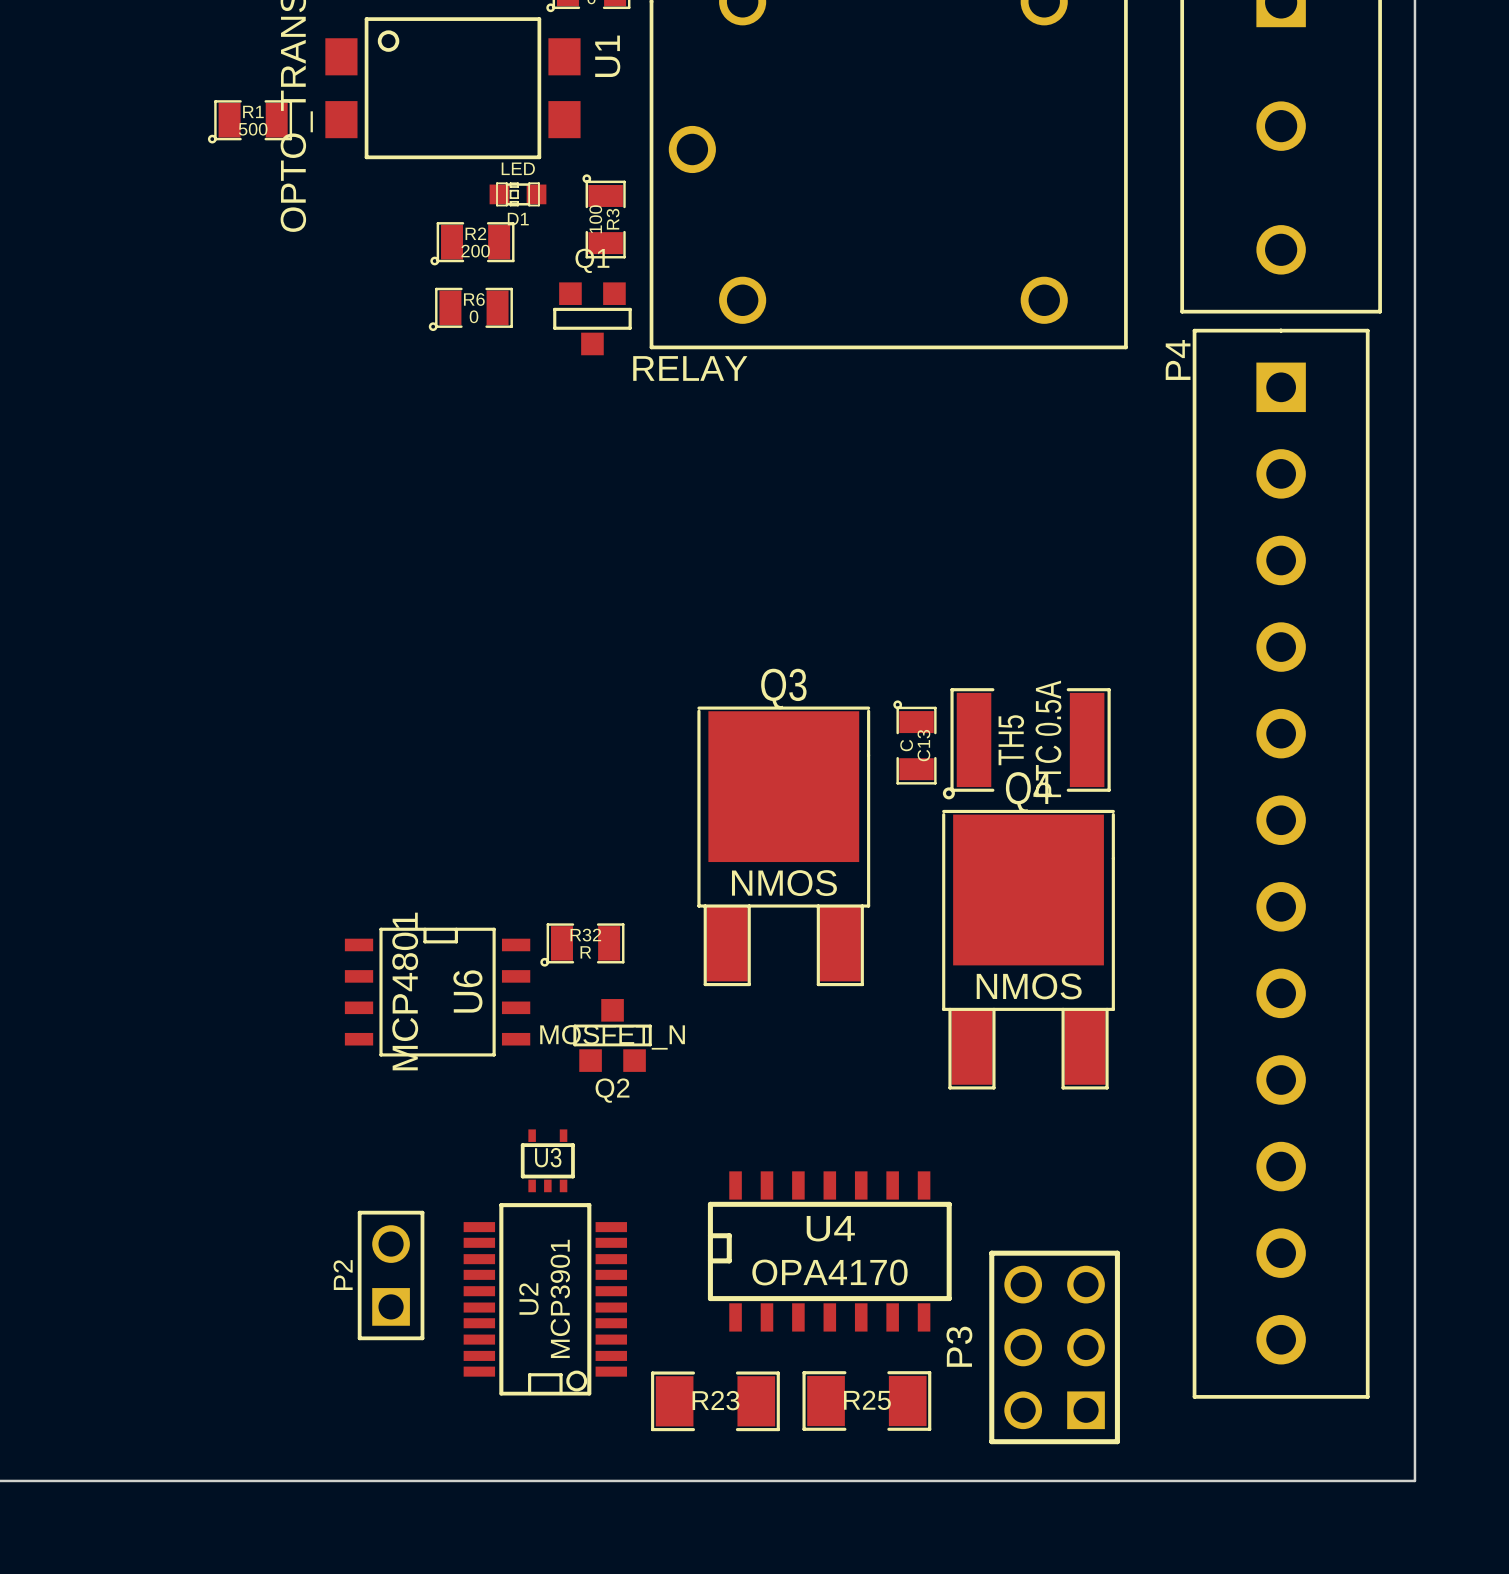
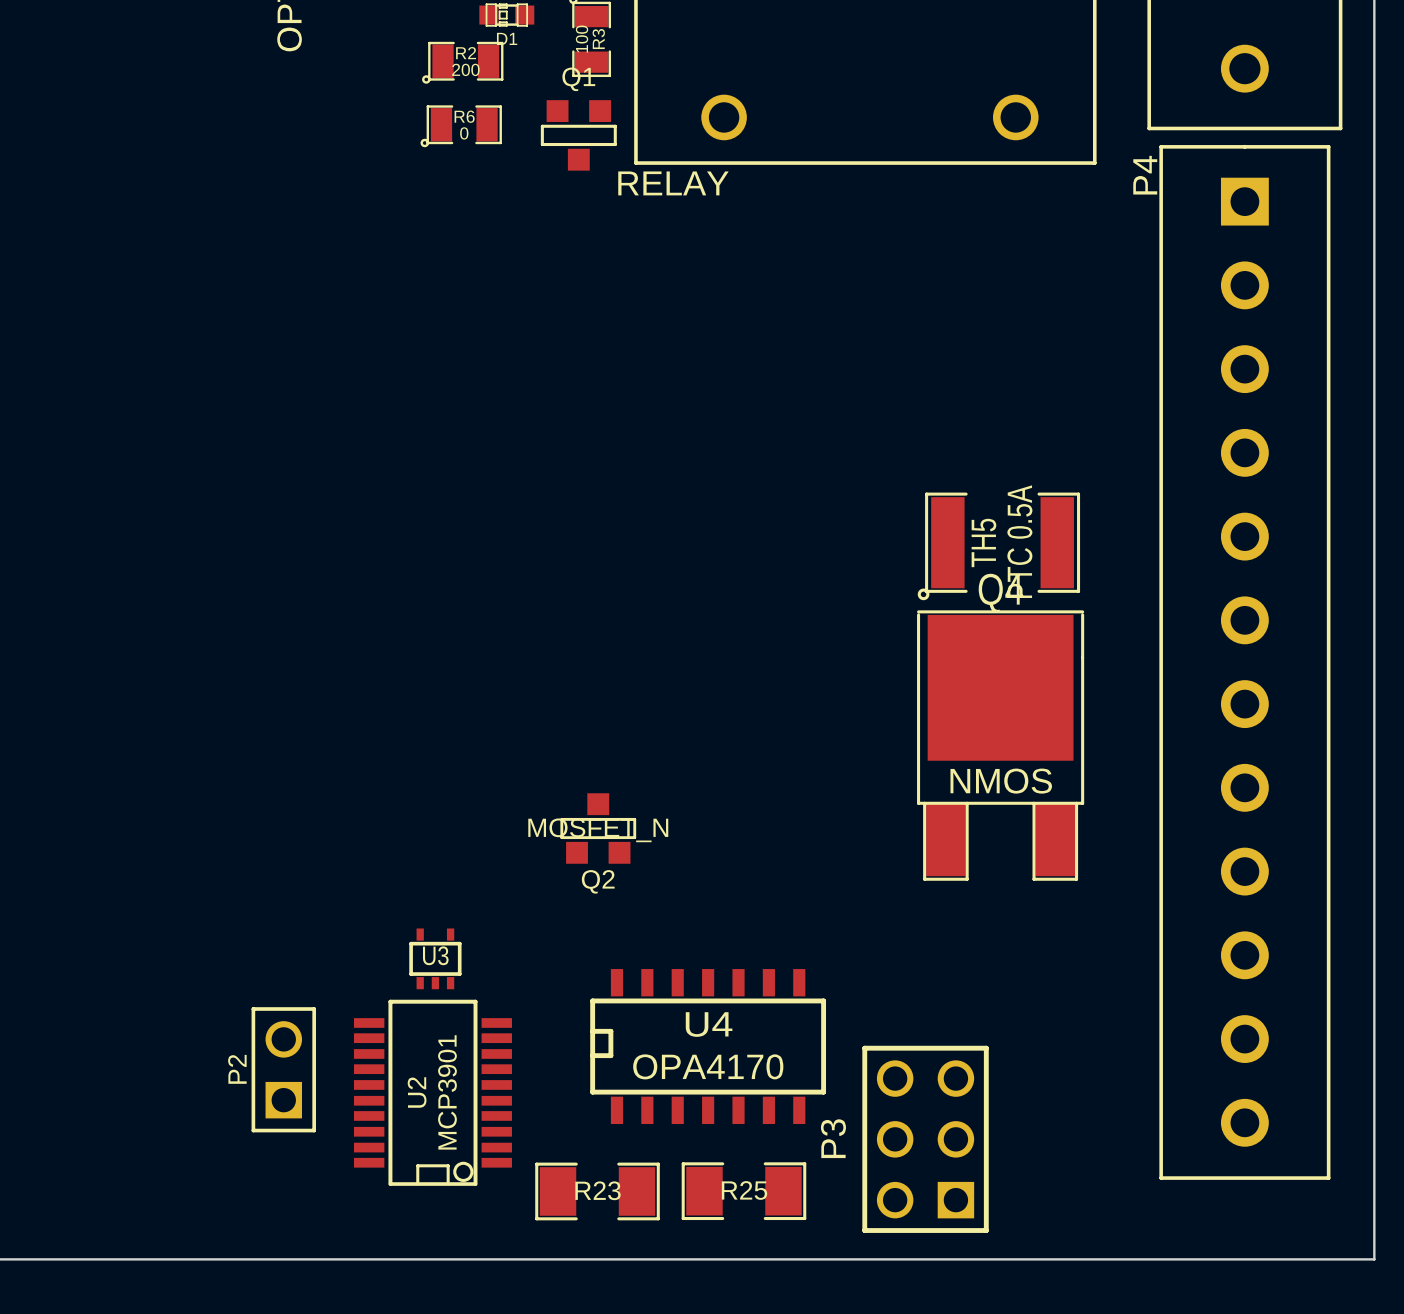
C13: C (914, 742) -> none
Q3: NMOS (783, 846) -> none
R32: R (582, 944) -> none
U6: MCP4801 (437, 992) -> none
U3 position: (547, 1160) -> (435, 958)
U4 position: (829, 1251) -> (708, 1046)
P2 position: (391, 1275) -> (283, 1069)
U2 position: (545, 1299) -> (432, 1092)
P3 position: (1054, 1347) -> (925, 1139)
R23 position: (715, 1401) -> (597, 1191)
R25 position: (866, 1401) -> (743, 1191)

